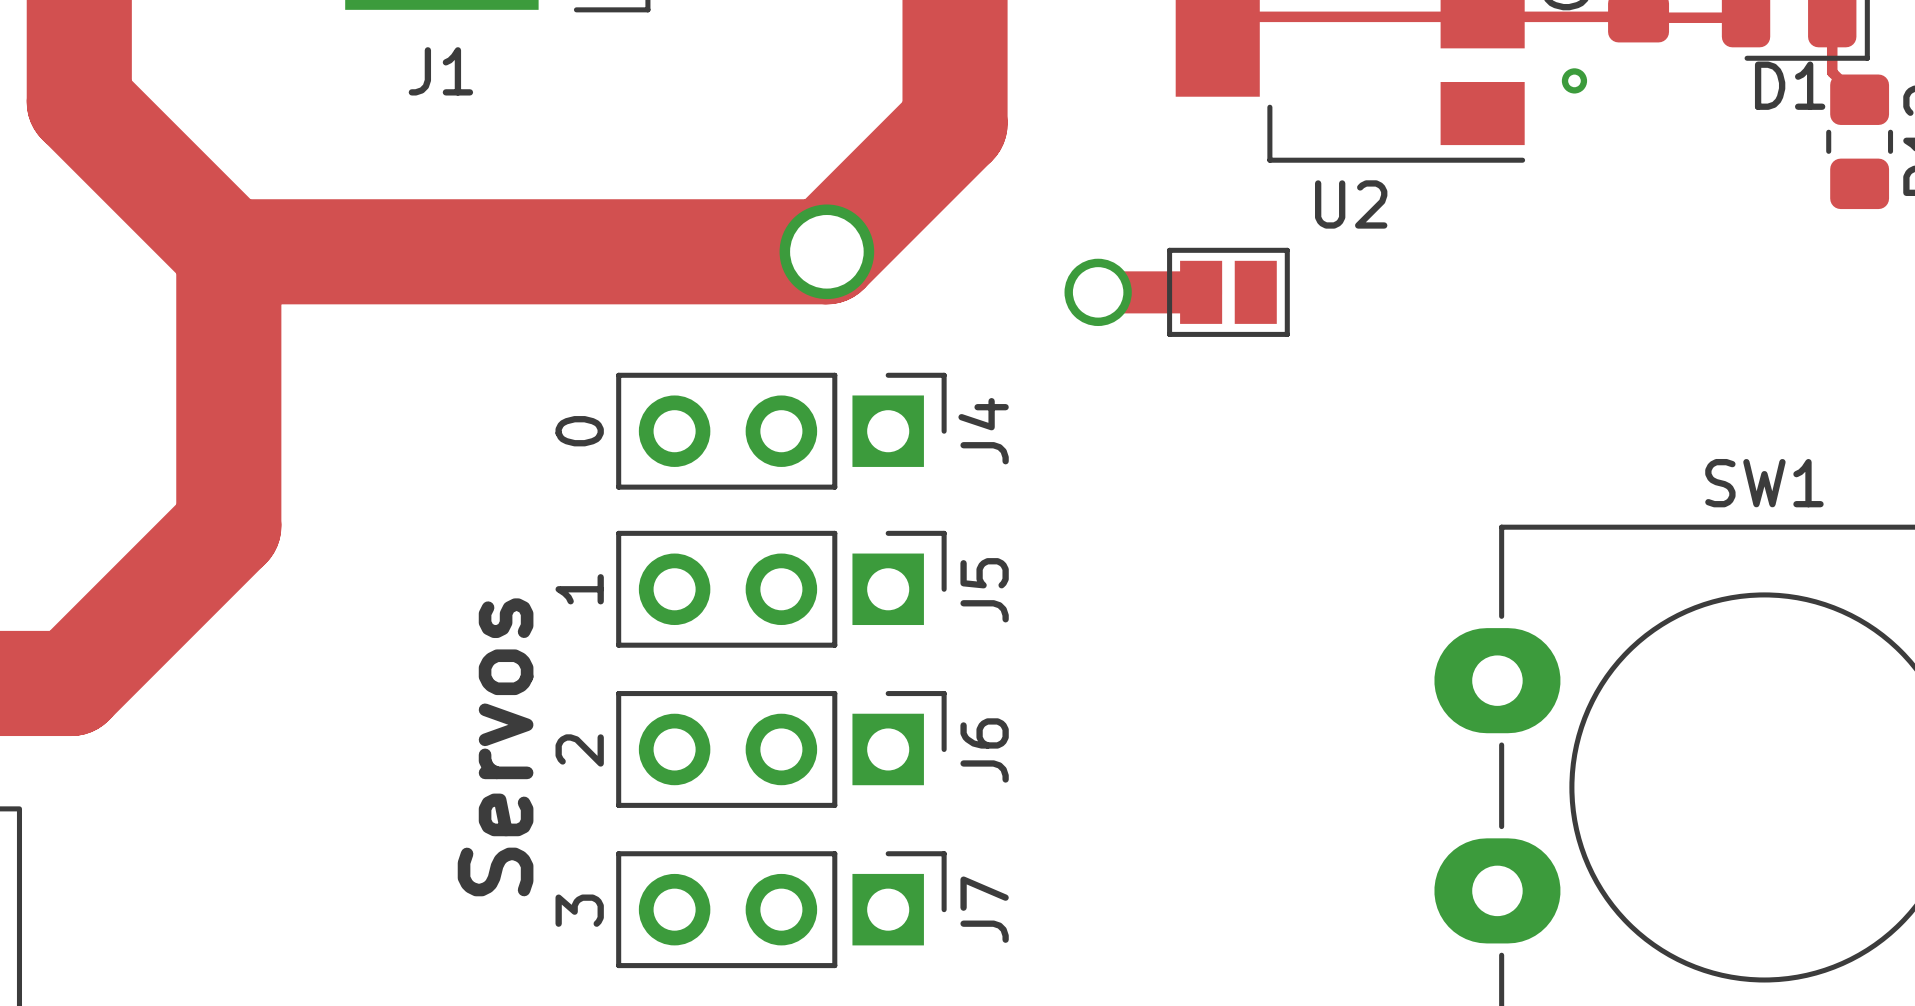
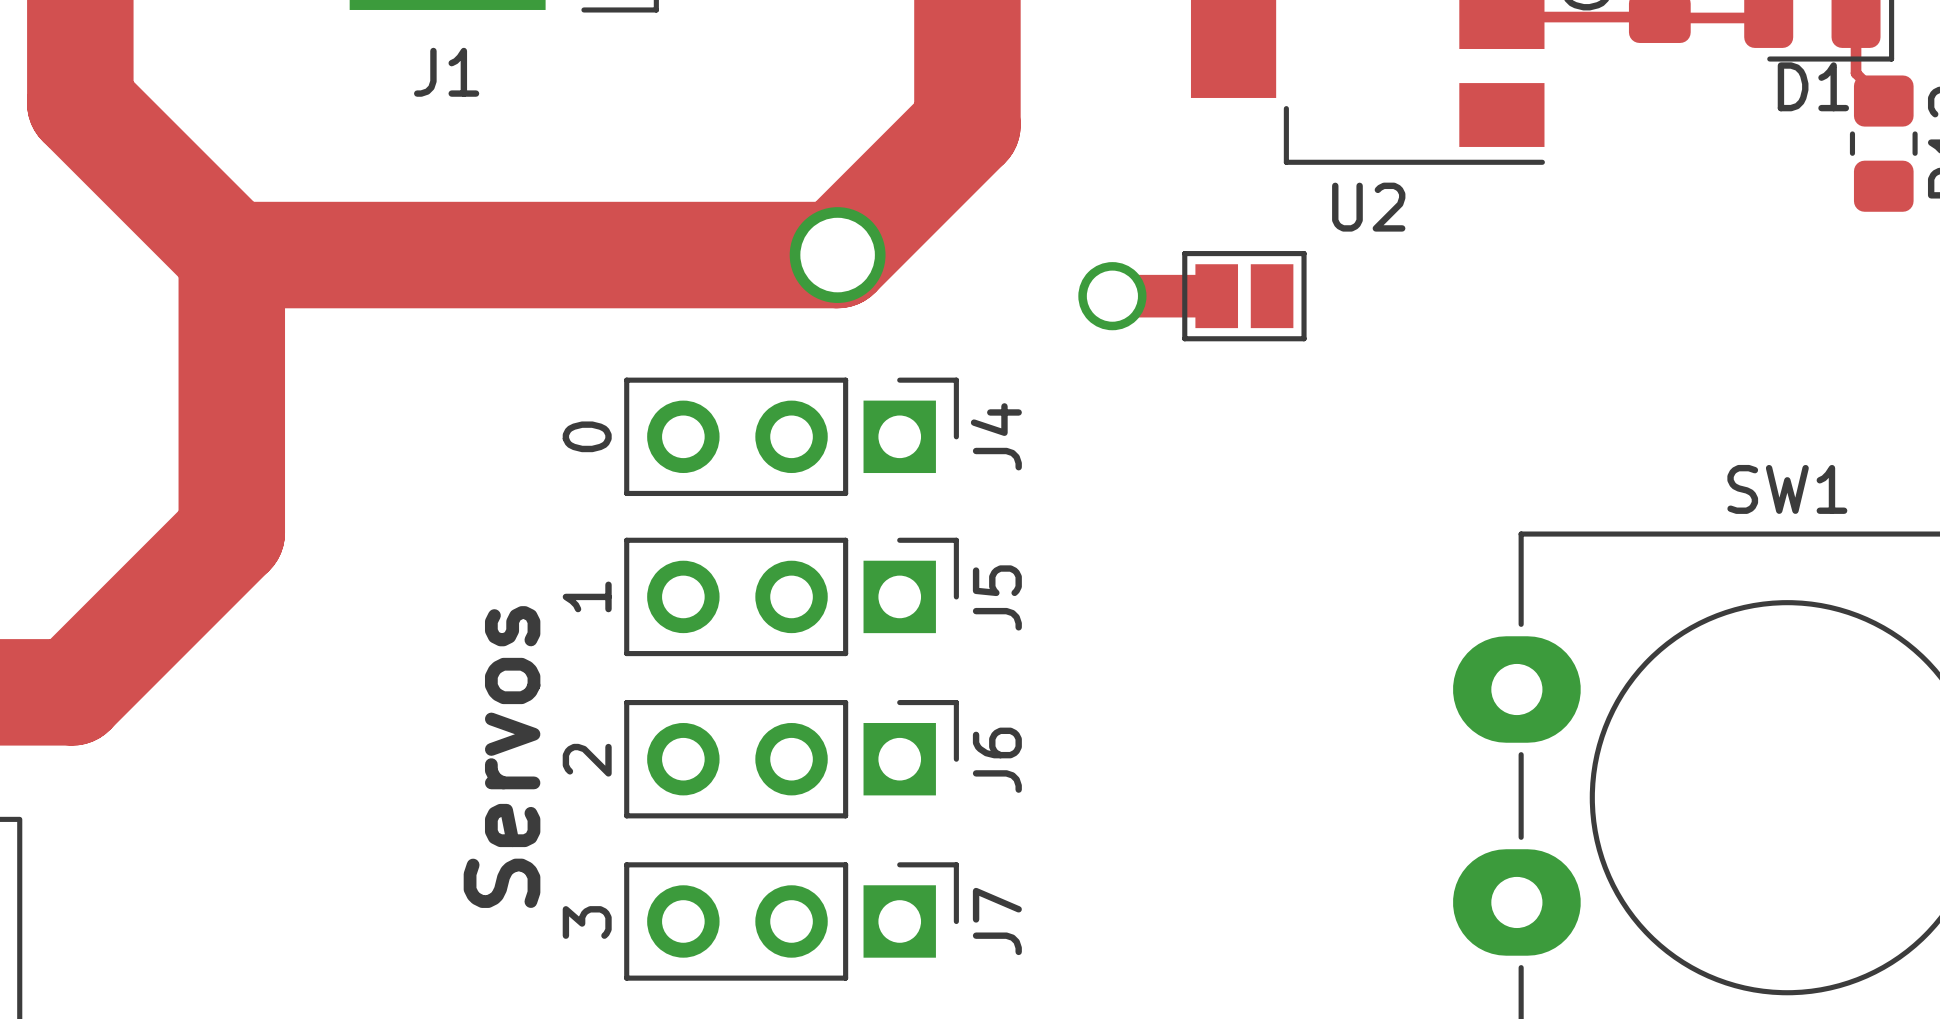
track: (1217, 16) (1482, 16) -> none
via: (1574, 80) -> none

